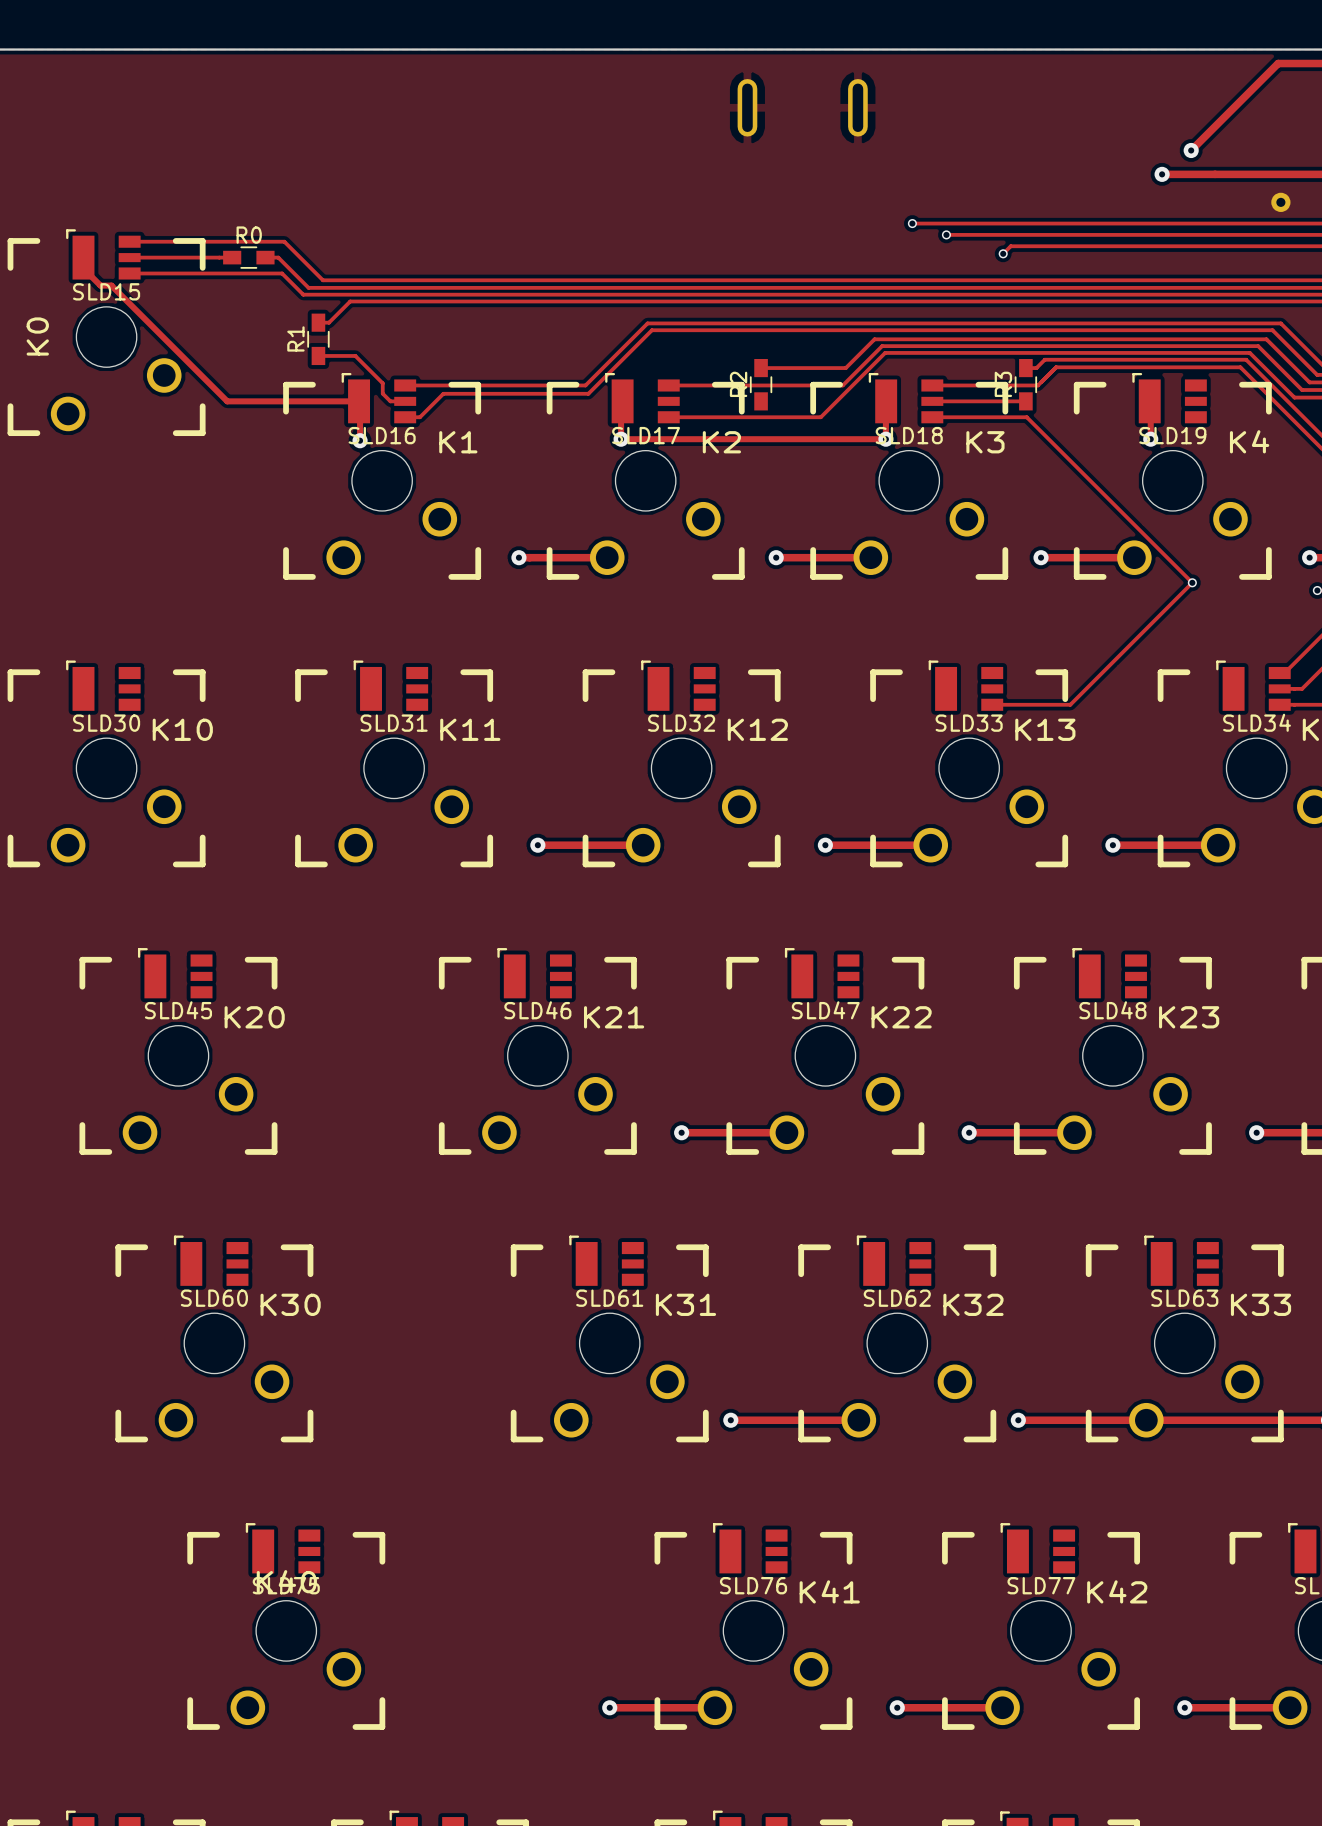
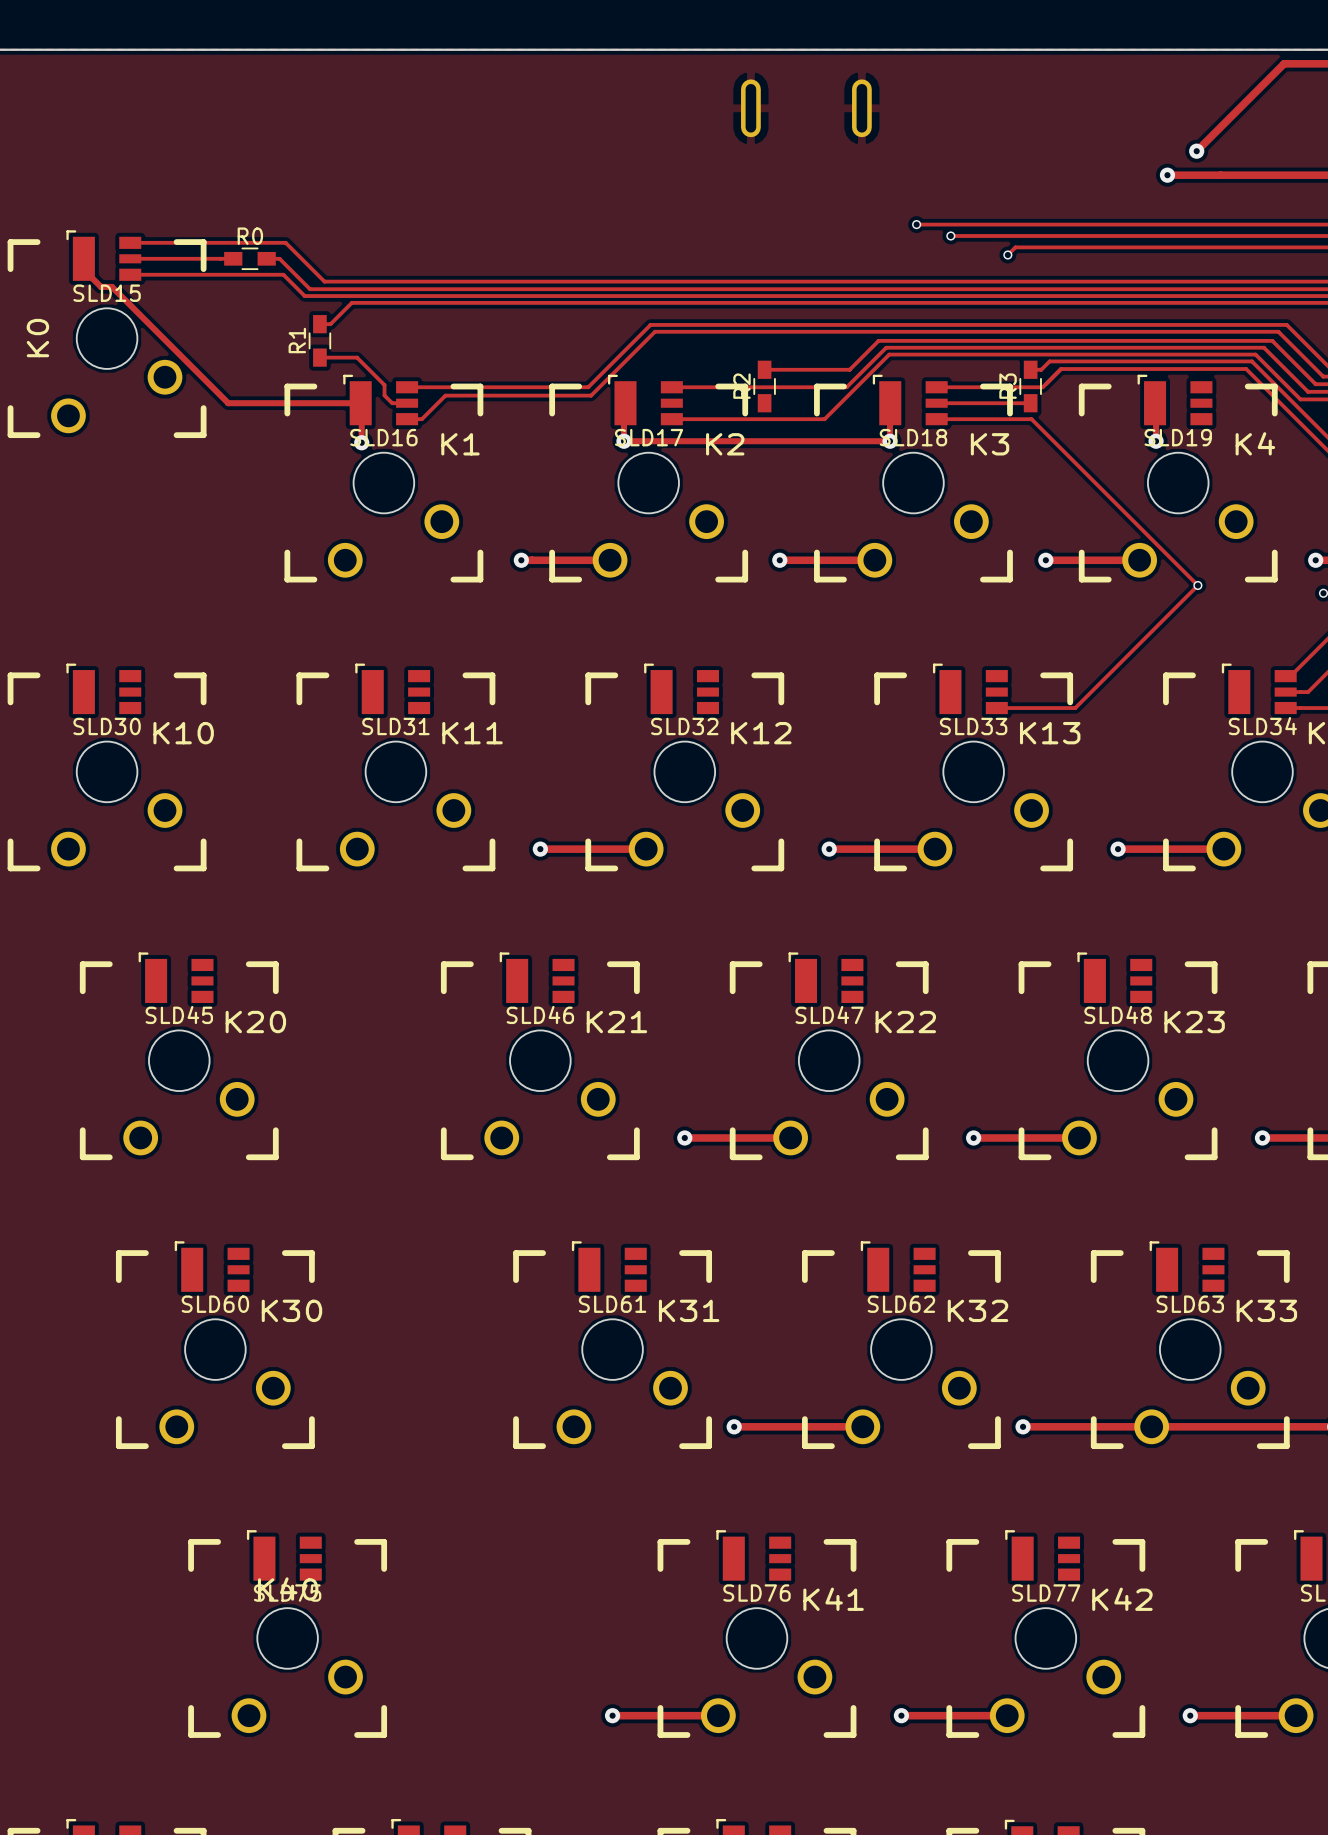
part: (1280, 202) -> none

